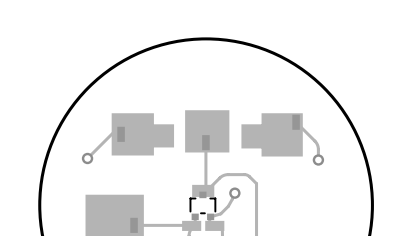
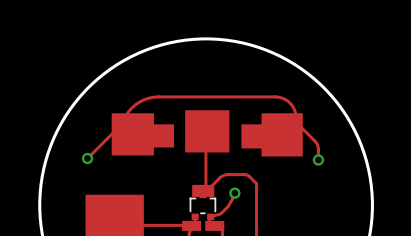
track: none -> (296, 122) (295, 112) (291, 105) (285, 99) (277, 97) (153, 97) (139, 101) (128, 111) (122, 124) (121, 134)

